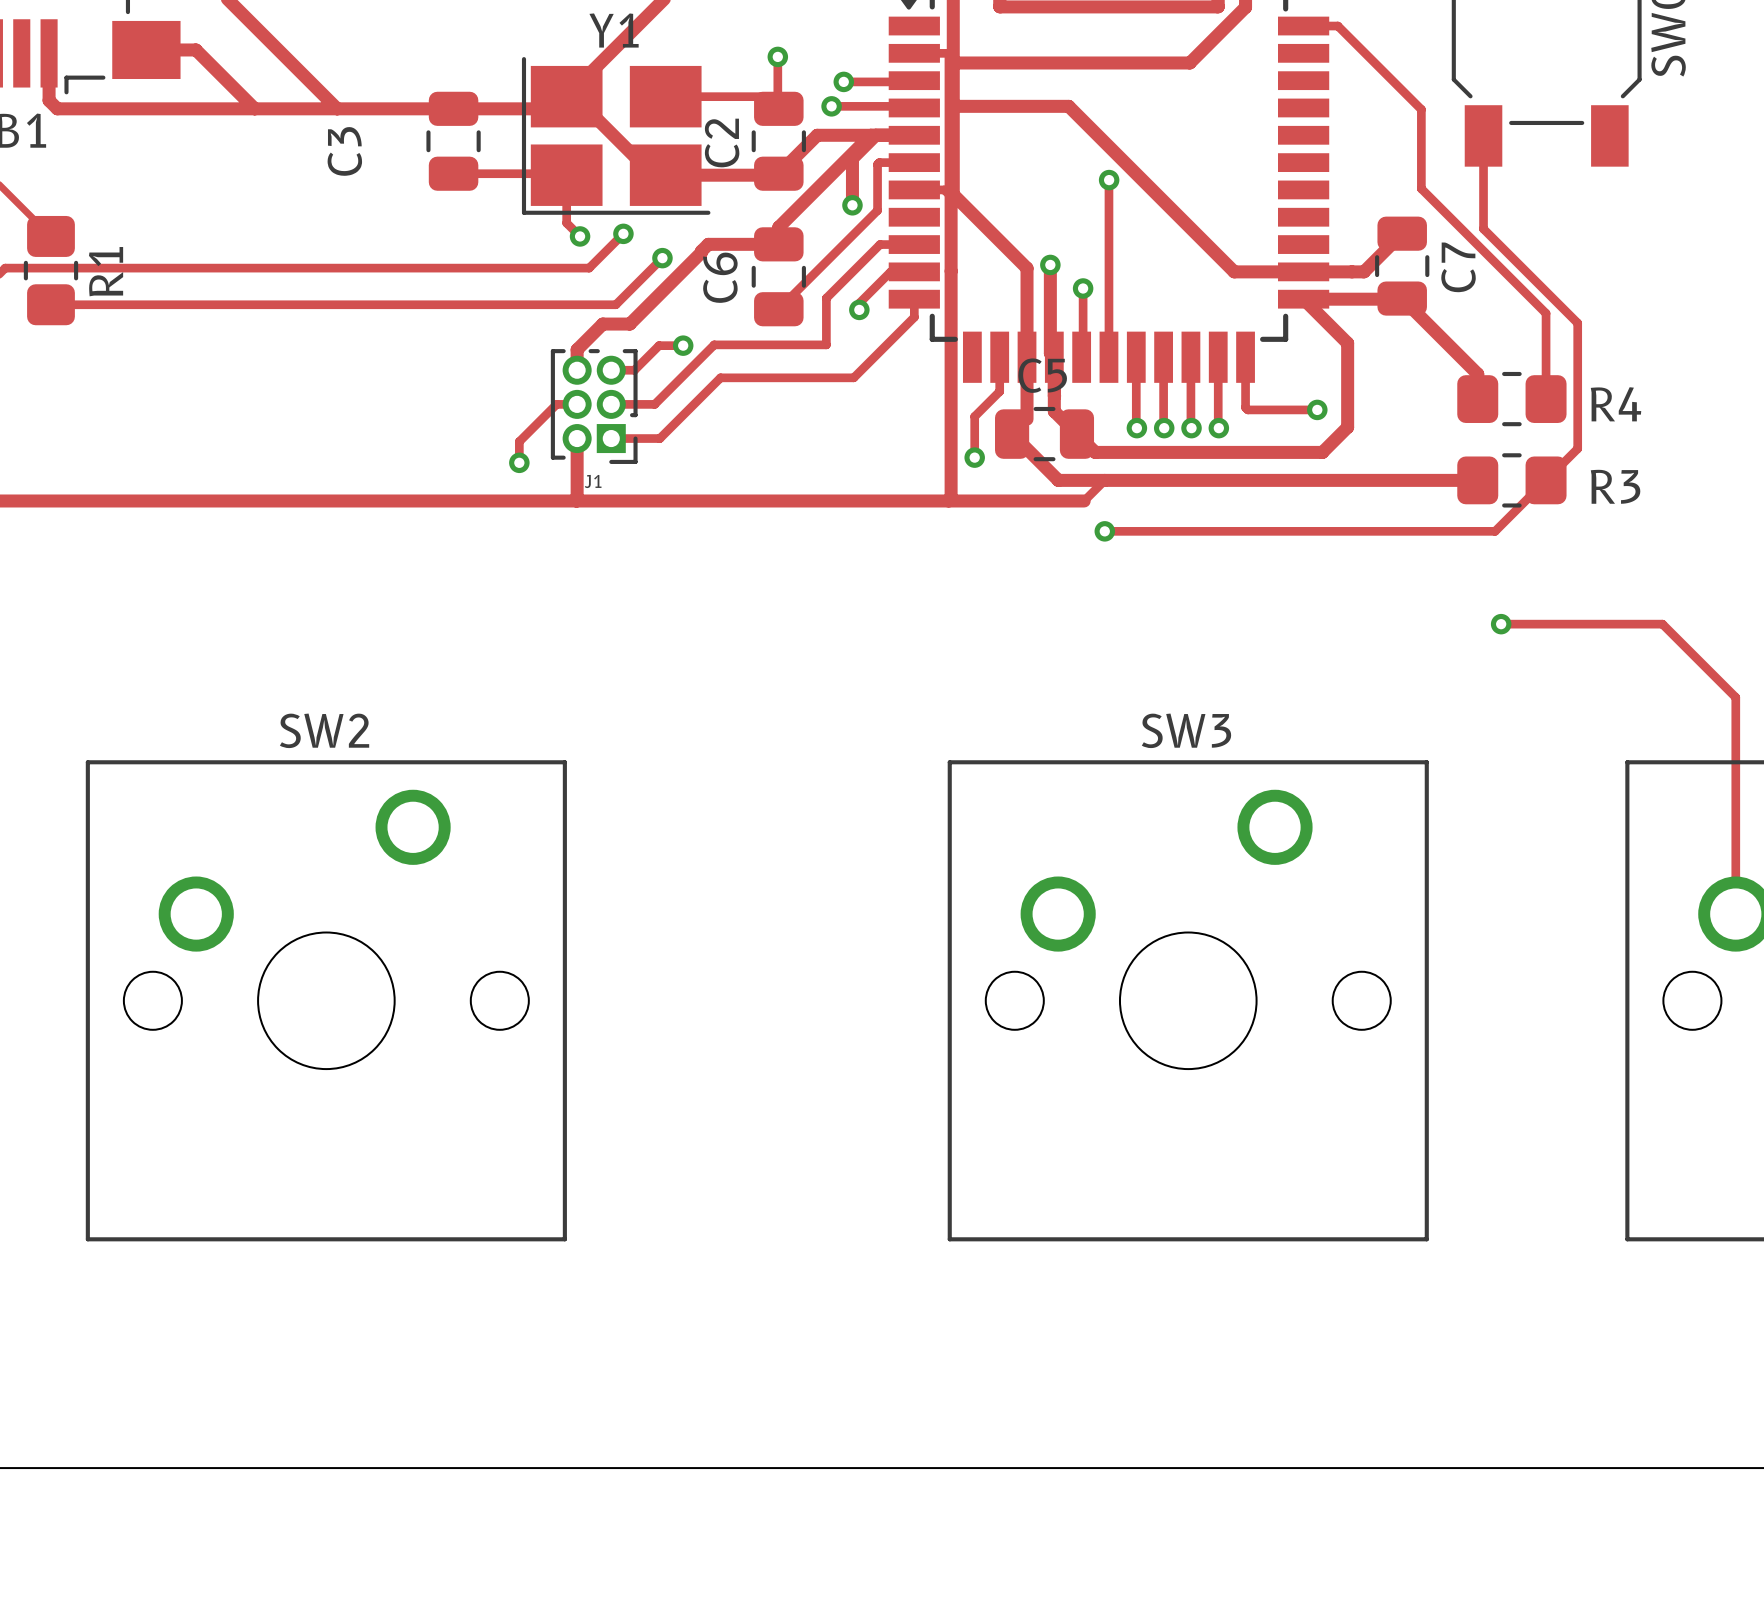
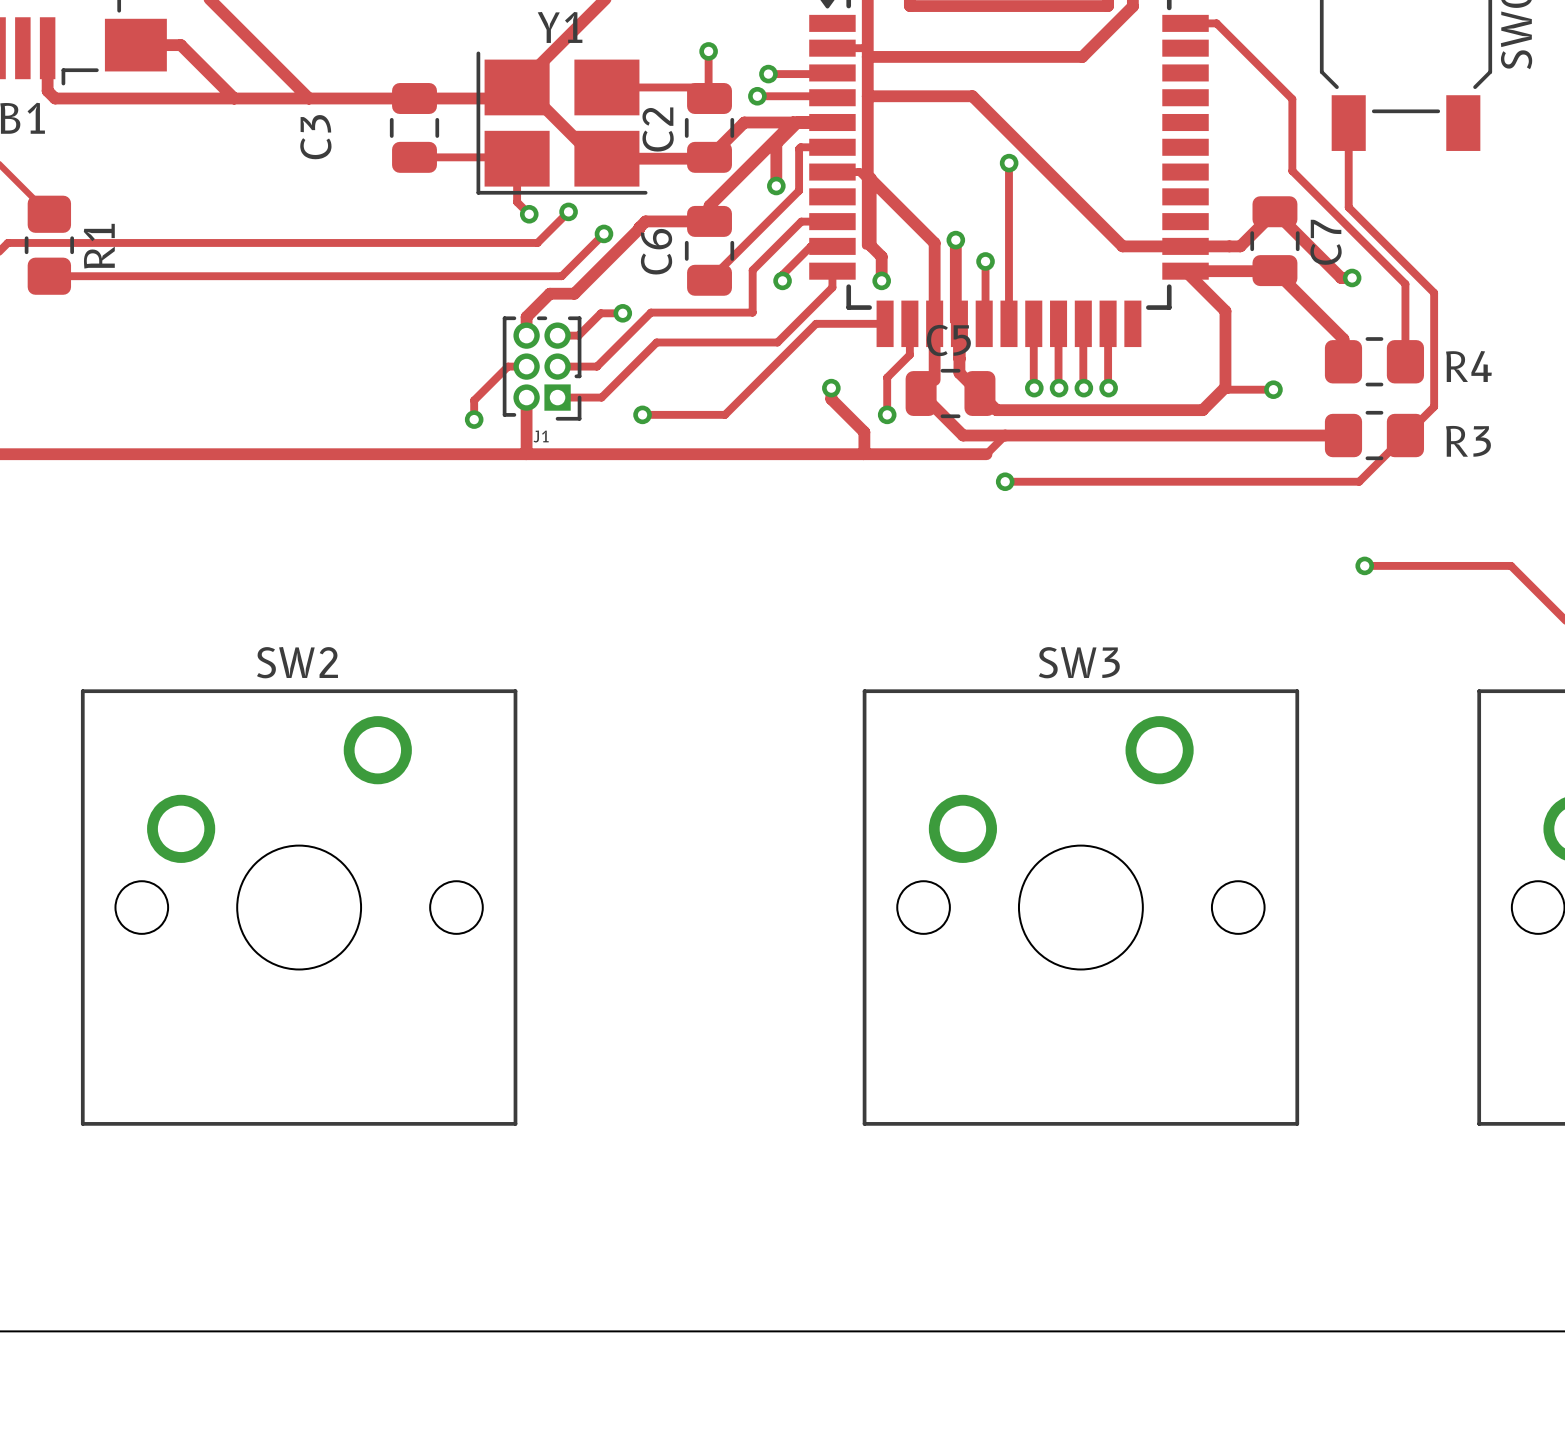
track: (951, 55) (951, 498) -> none
track: none -> (870, 178) (870, 245) (881, 256) (881, 280)
track: none -> (1274, 211) (1341, 277) (1352, 277)
via: none -> (1352, 277)
via: none -> (881, 280)
track: none -> (885, 323) (816, 323) (725, 414) (642, 414)
track: (1245, 357) (1245, 407) (1247, 409) (1317, 409) -> none
via position: (1317, 409) -> (1273, 389)
track: none -> (1225, 387) (1227, 389) (1273, 389)
track: none -> (831, 388) (831, 399) (864, 432) (863, 454)
via: none -> (831, 388)
via: none -> (642, 414)

